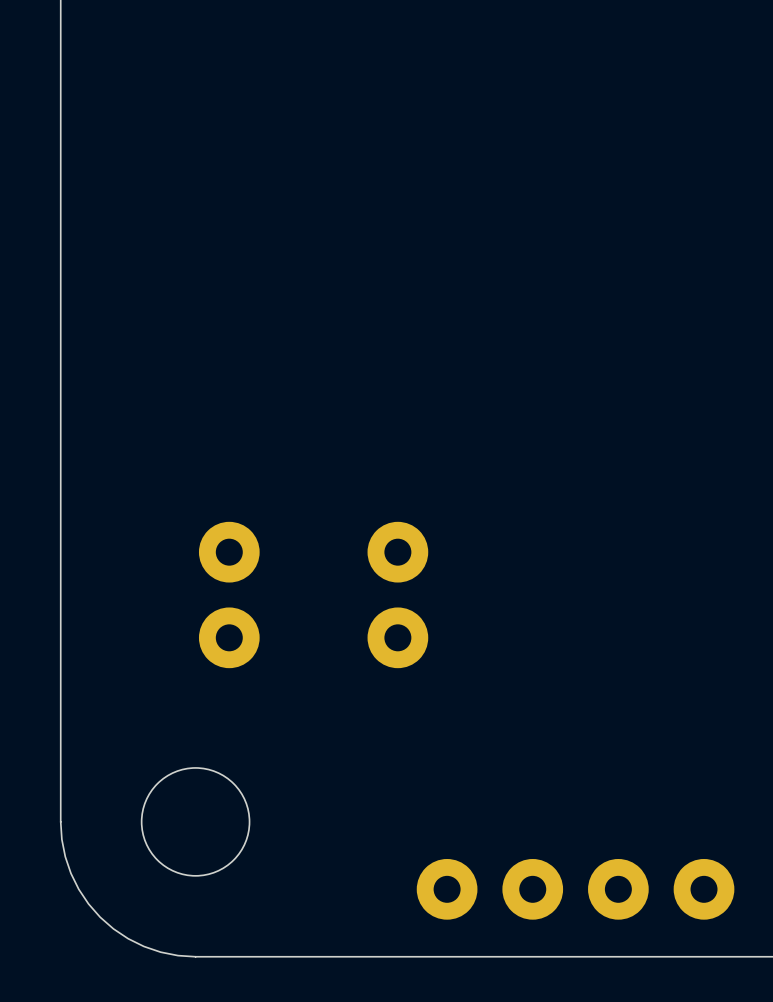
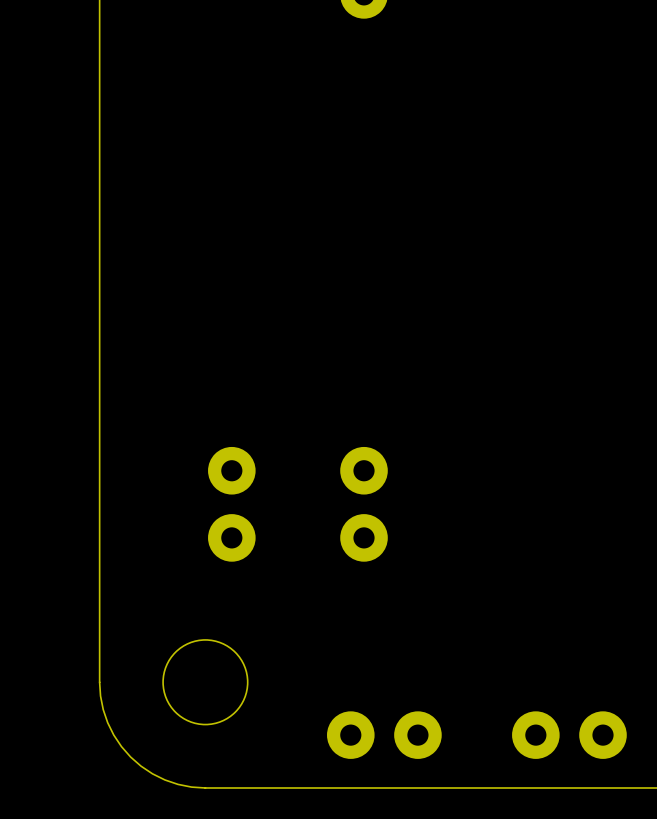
part: none -> (384, 735)
part: (575, 889) -> none
part: none -> (569, 735)

